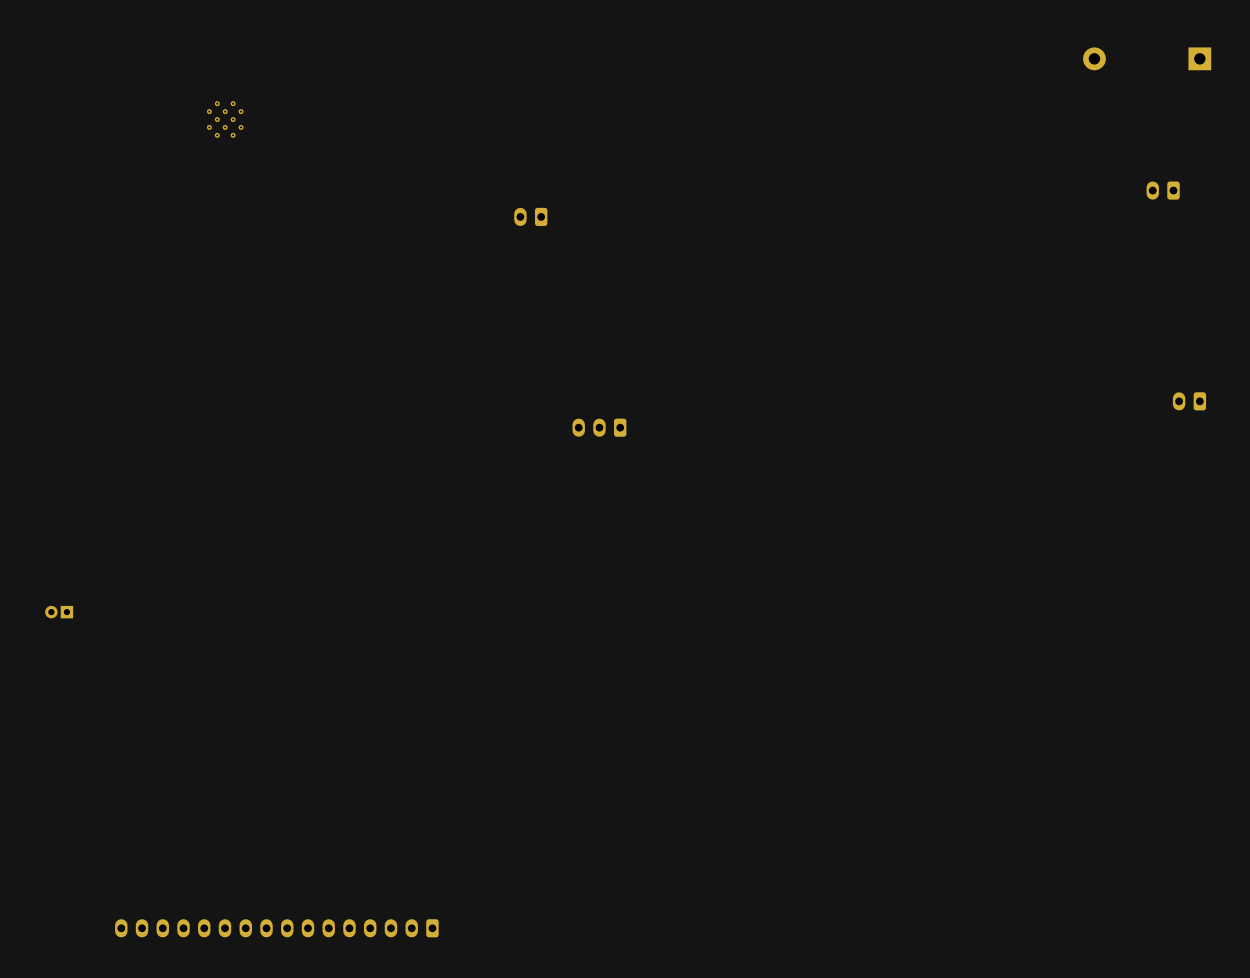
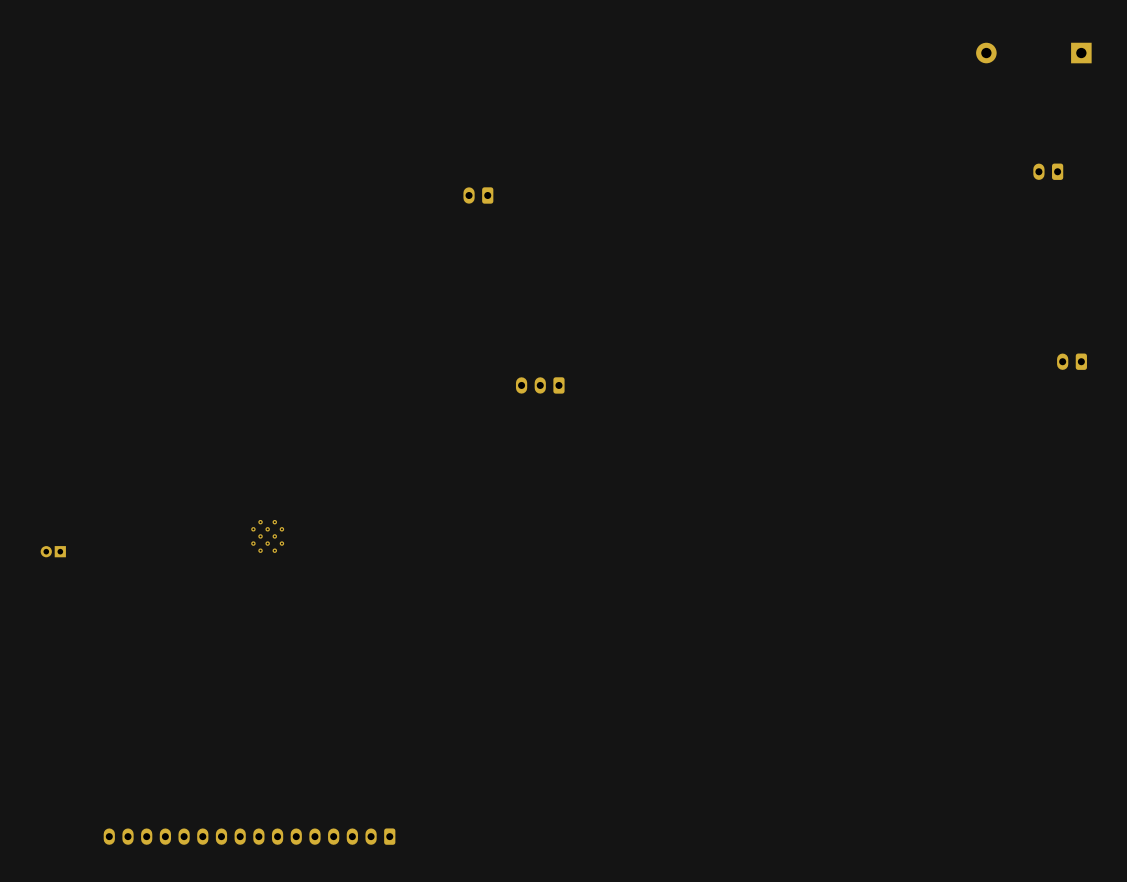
part: (225, 119) -> none
part: none -> (267, 536)

